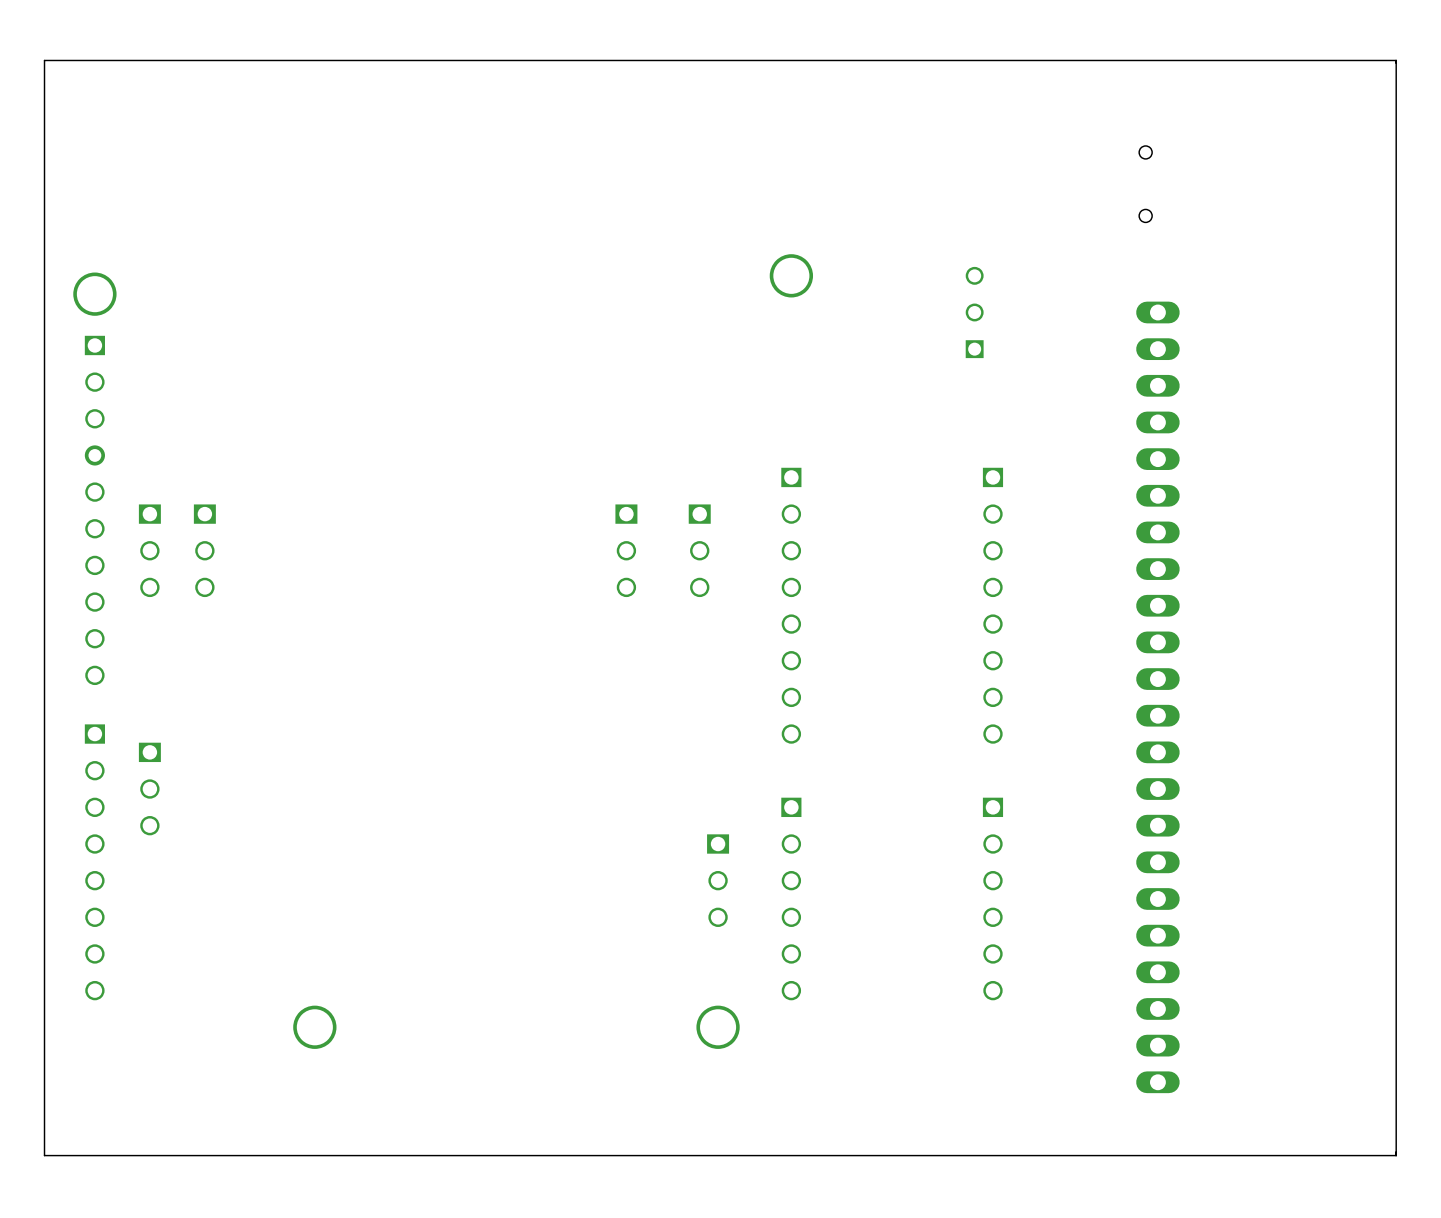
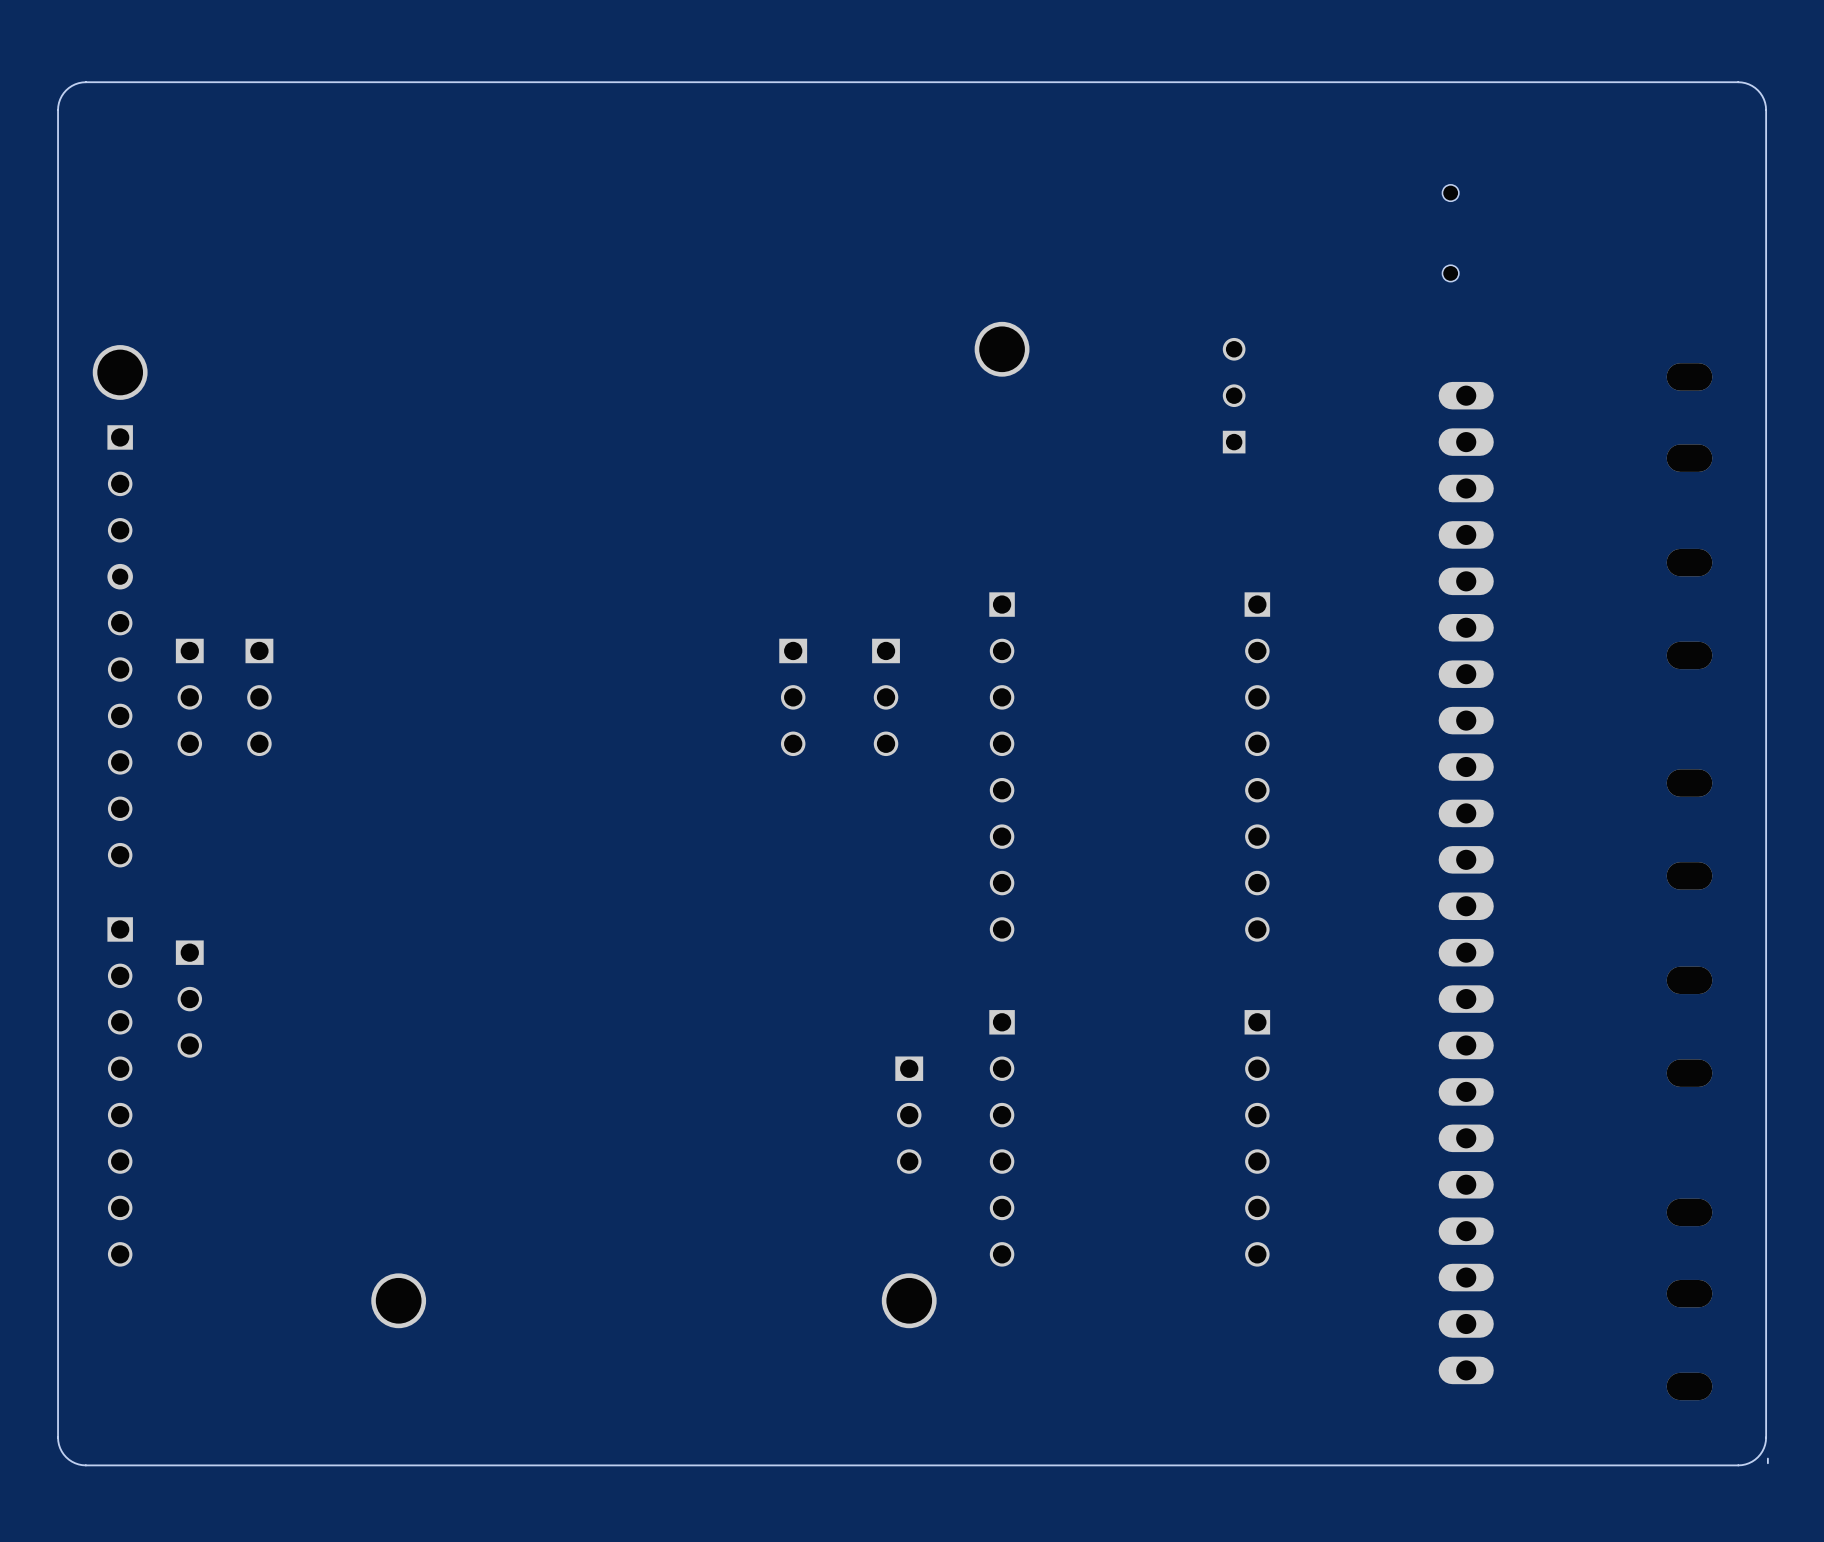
board edge: none -> (1738, 82) (85, 82) (68, 87) (60, 99) (58, 110) (58, 1437) (63, 1454) (75, 1463) (85, 1465) (1738, 1465) (1755, 1459) (1763, 1448) (1766, 1437) (1766, 110) (1763, 99) (1757, 90) (1748, 84) (1738, 82)
part: none -> (1689, 376)
part: none -> (1689, 458)
part: none -> (1689, 562)
part: none -> (1689, 655)
part: none -> (1689, 783)
part: none -> (1689, 875)
part: none -> (1689, 980)
part: none -> (1689, 1073)
part: none -> (1689, 1212)
part: none -> (1689, 1293)
part: none -> (1689, 1386)
board edge: (1396, 1151) (1396, 60) (44, 60) (44, 1155) (1396, 1155) -> none

